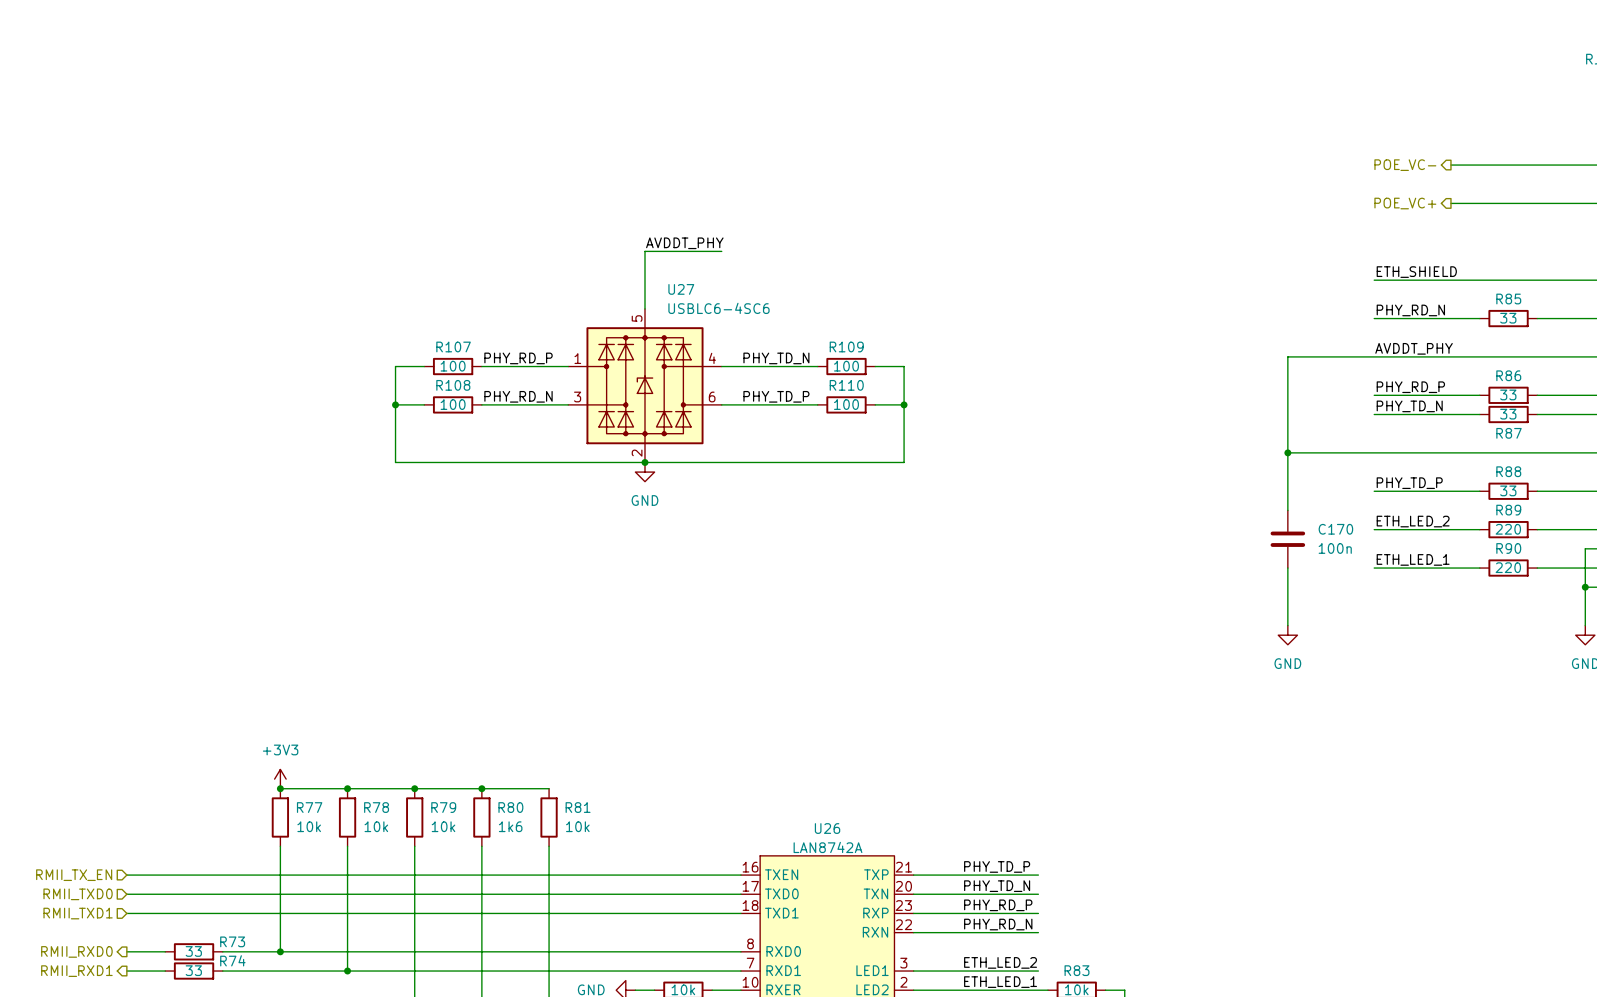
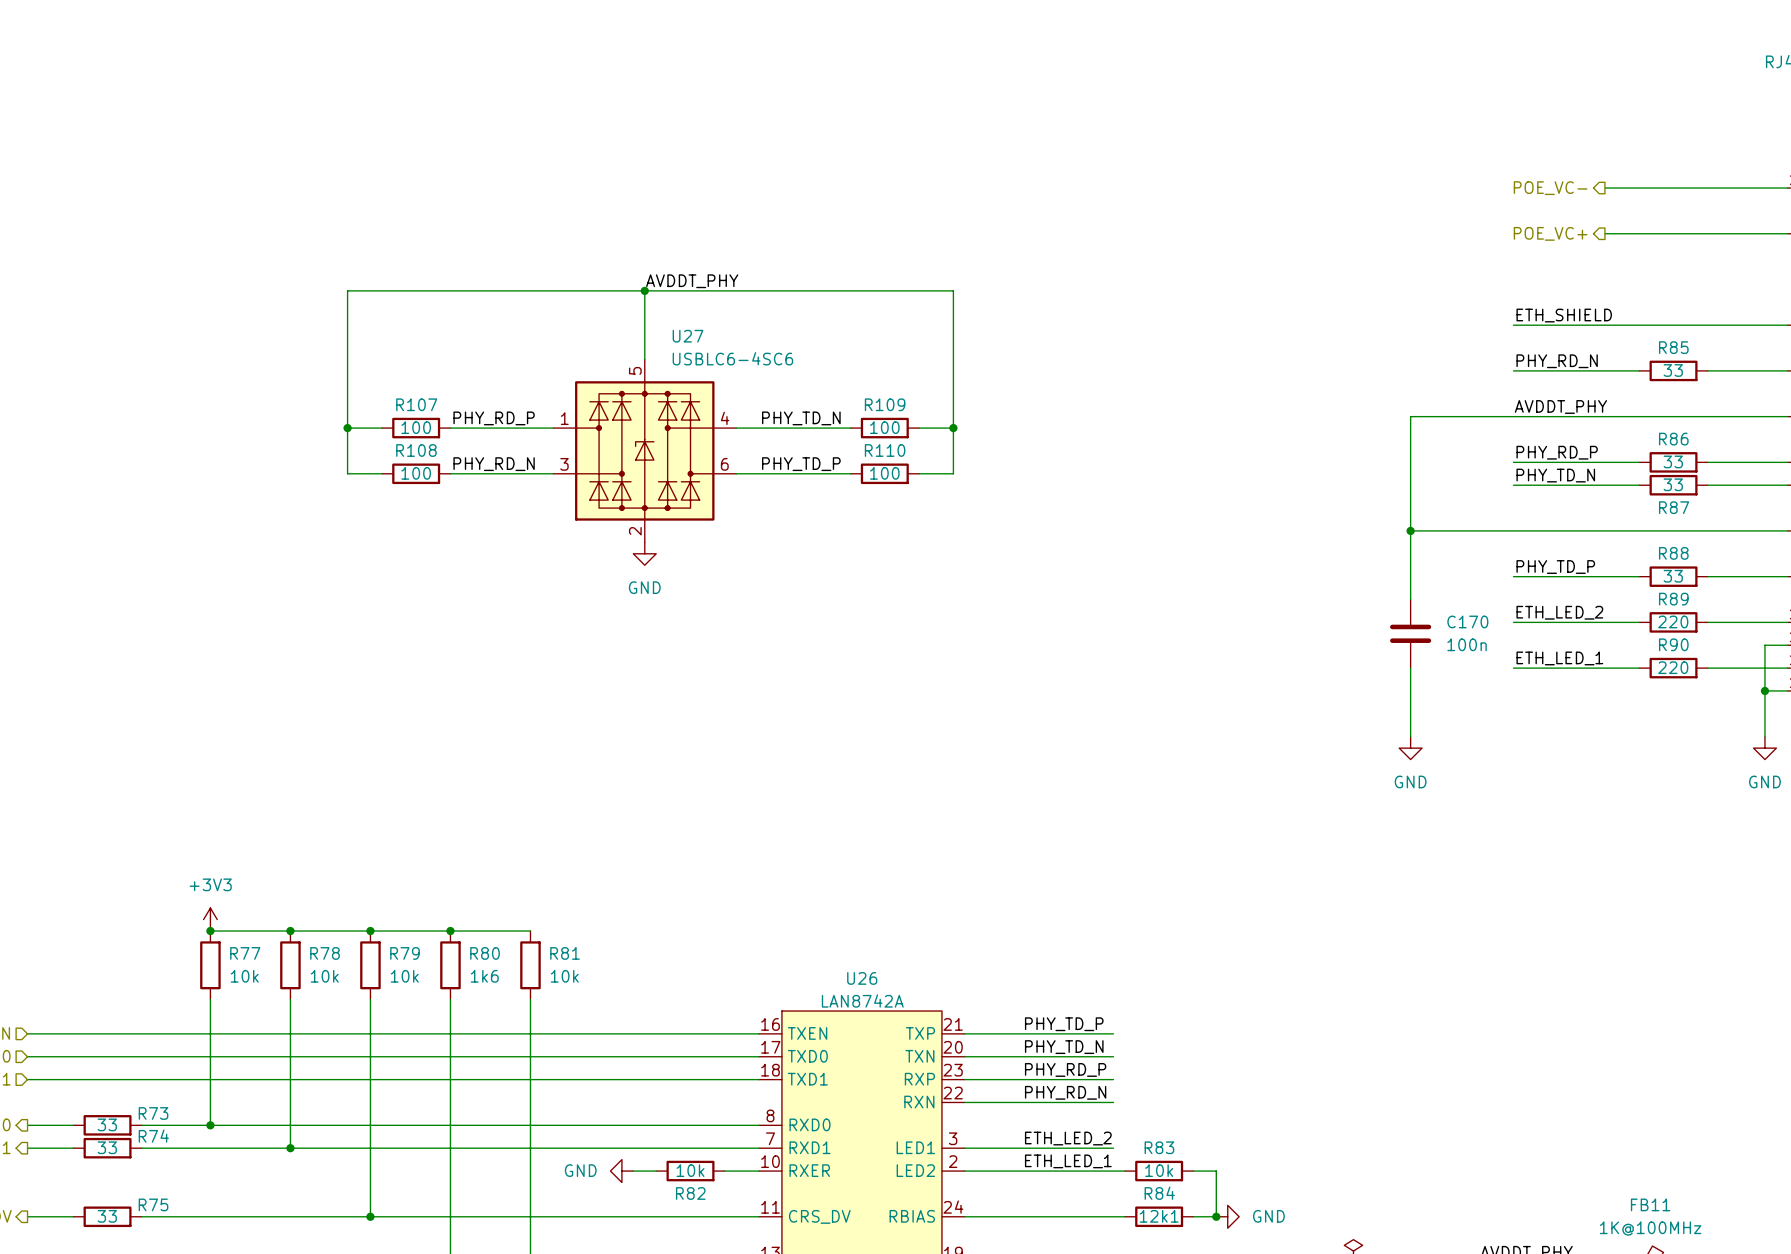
wire: none -> (644, 290) (347, 290) (347, 428)
junction: none -> (644, 290)
wire: none -> (736, 290) (953, 290) (953, 428)
wire: (395, 404) (395, 462) (904, 462) (904, 404) -> none
junction position: (395, 404) -> (347, 428)
junction position: (904, 404) -> (953, 428)
junction: (644, 462) -> none

